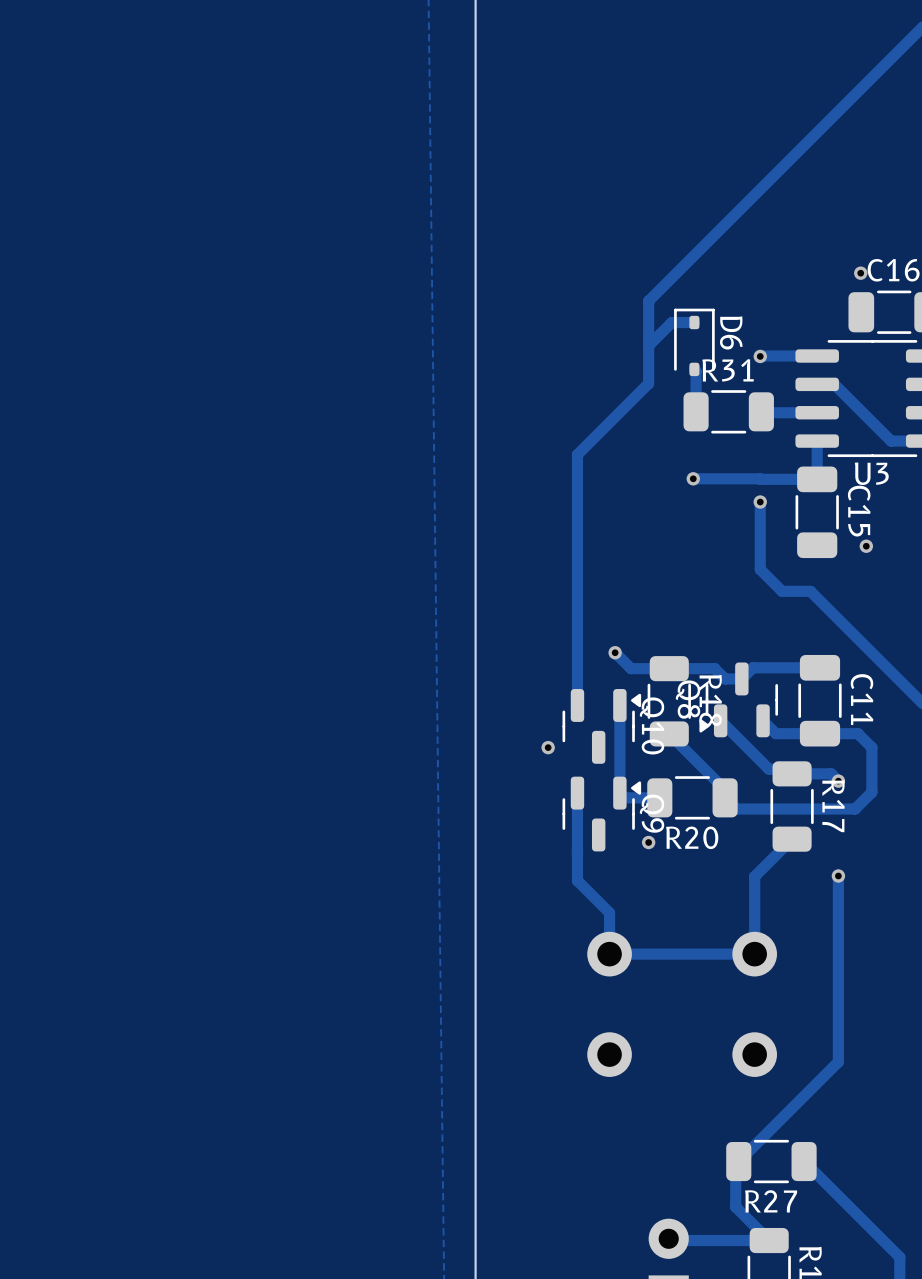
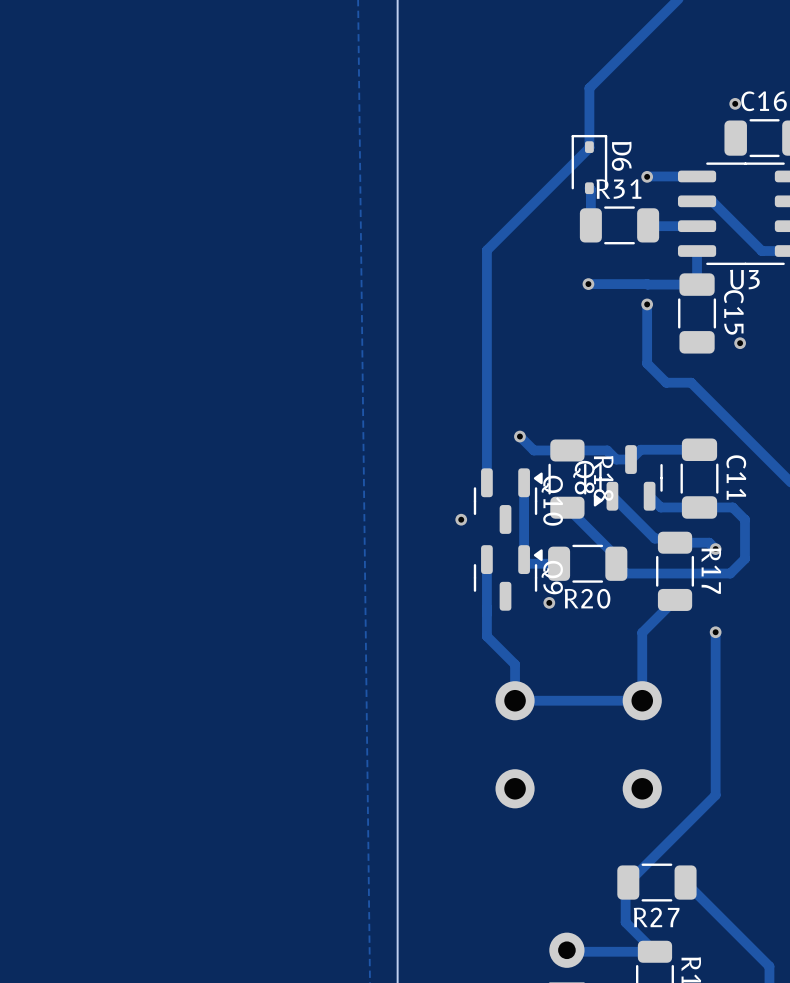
track: (694, 255) (648, 301) (648, 383) (577, 454) -> (589, 88) (589, 147) (486, 250) (486, 262)
track: (694, 322) (671, 322) (648, 345) -> none

